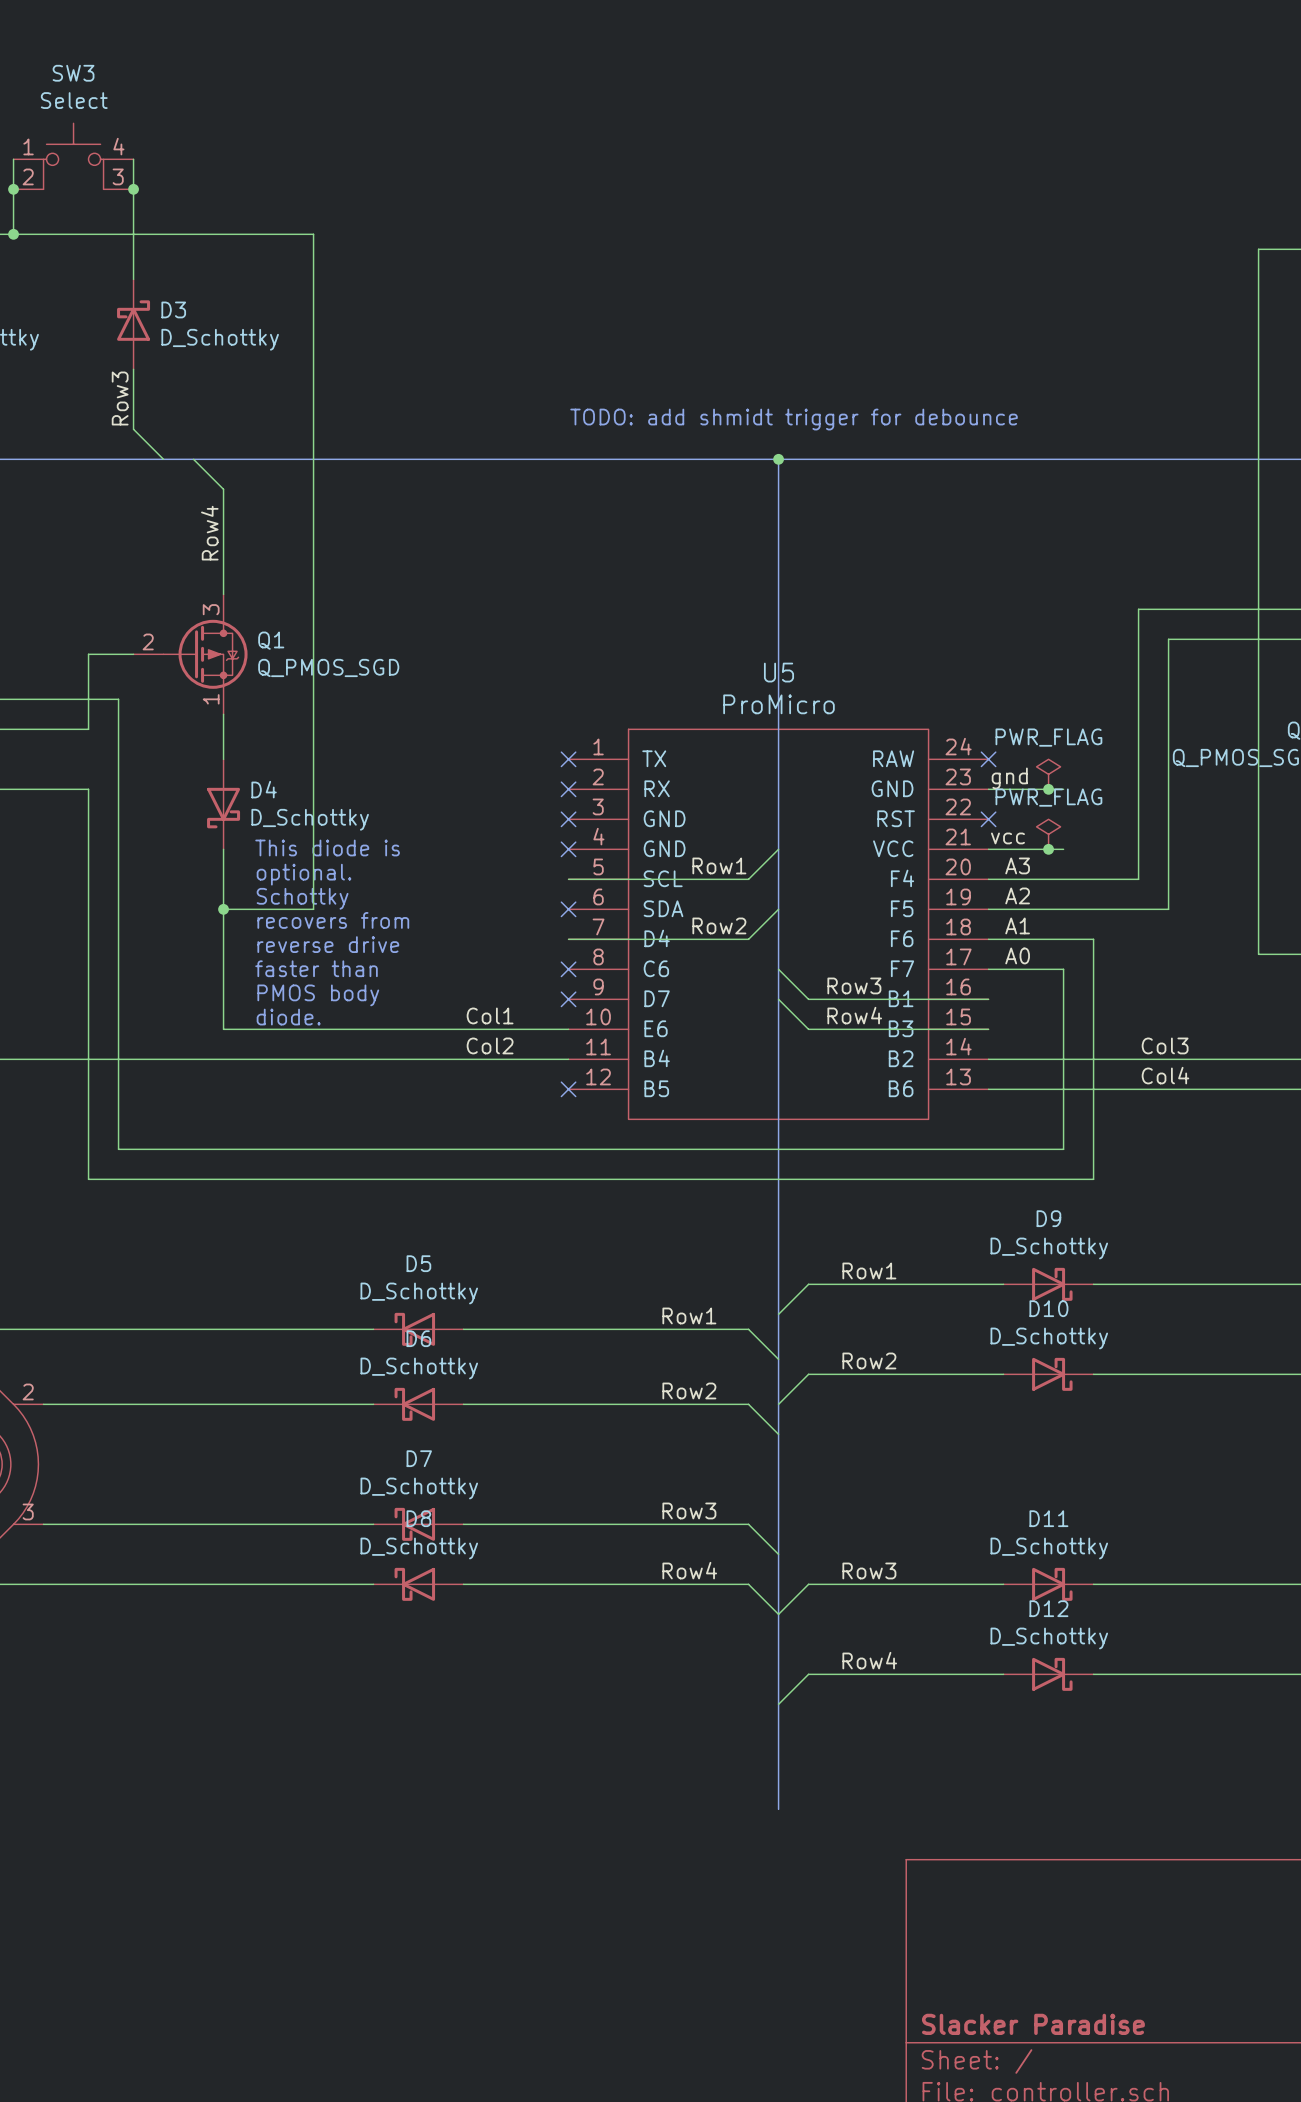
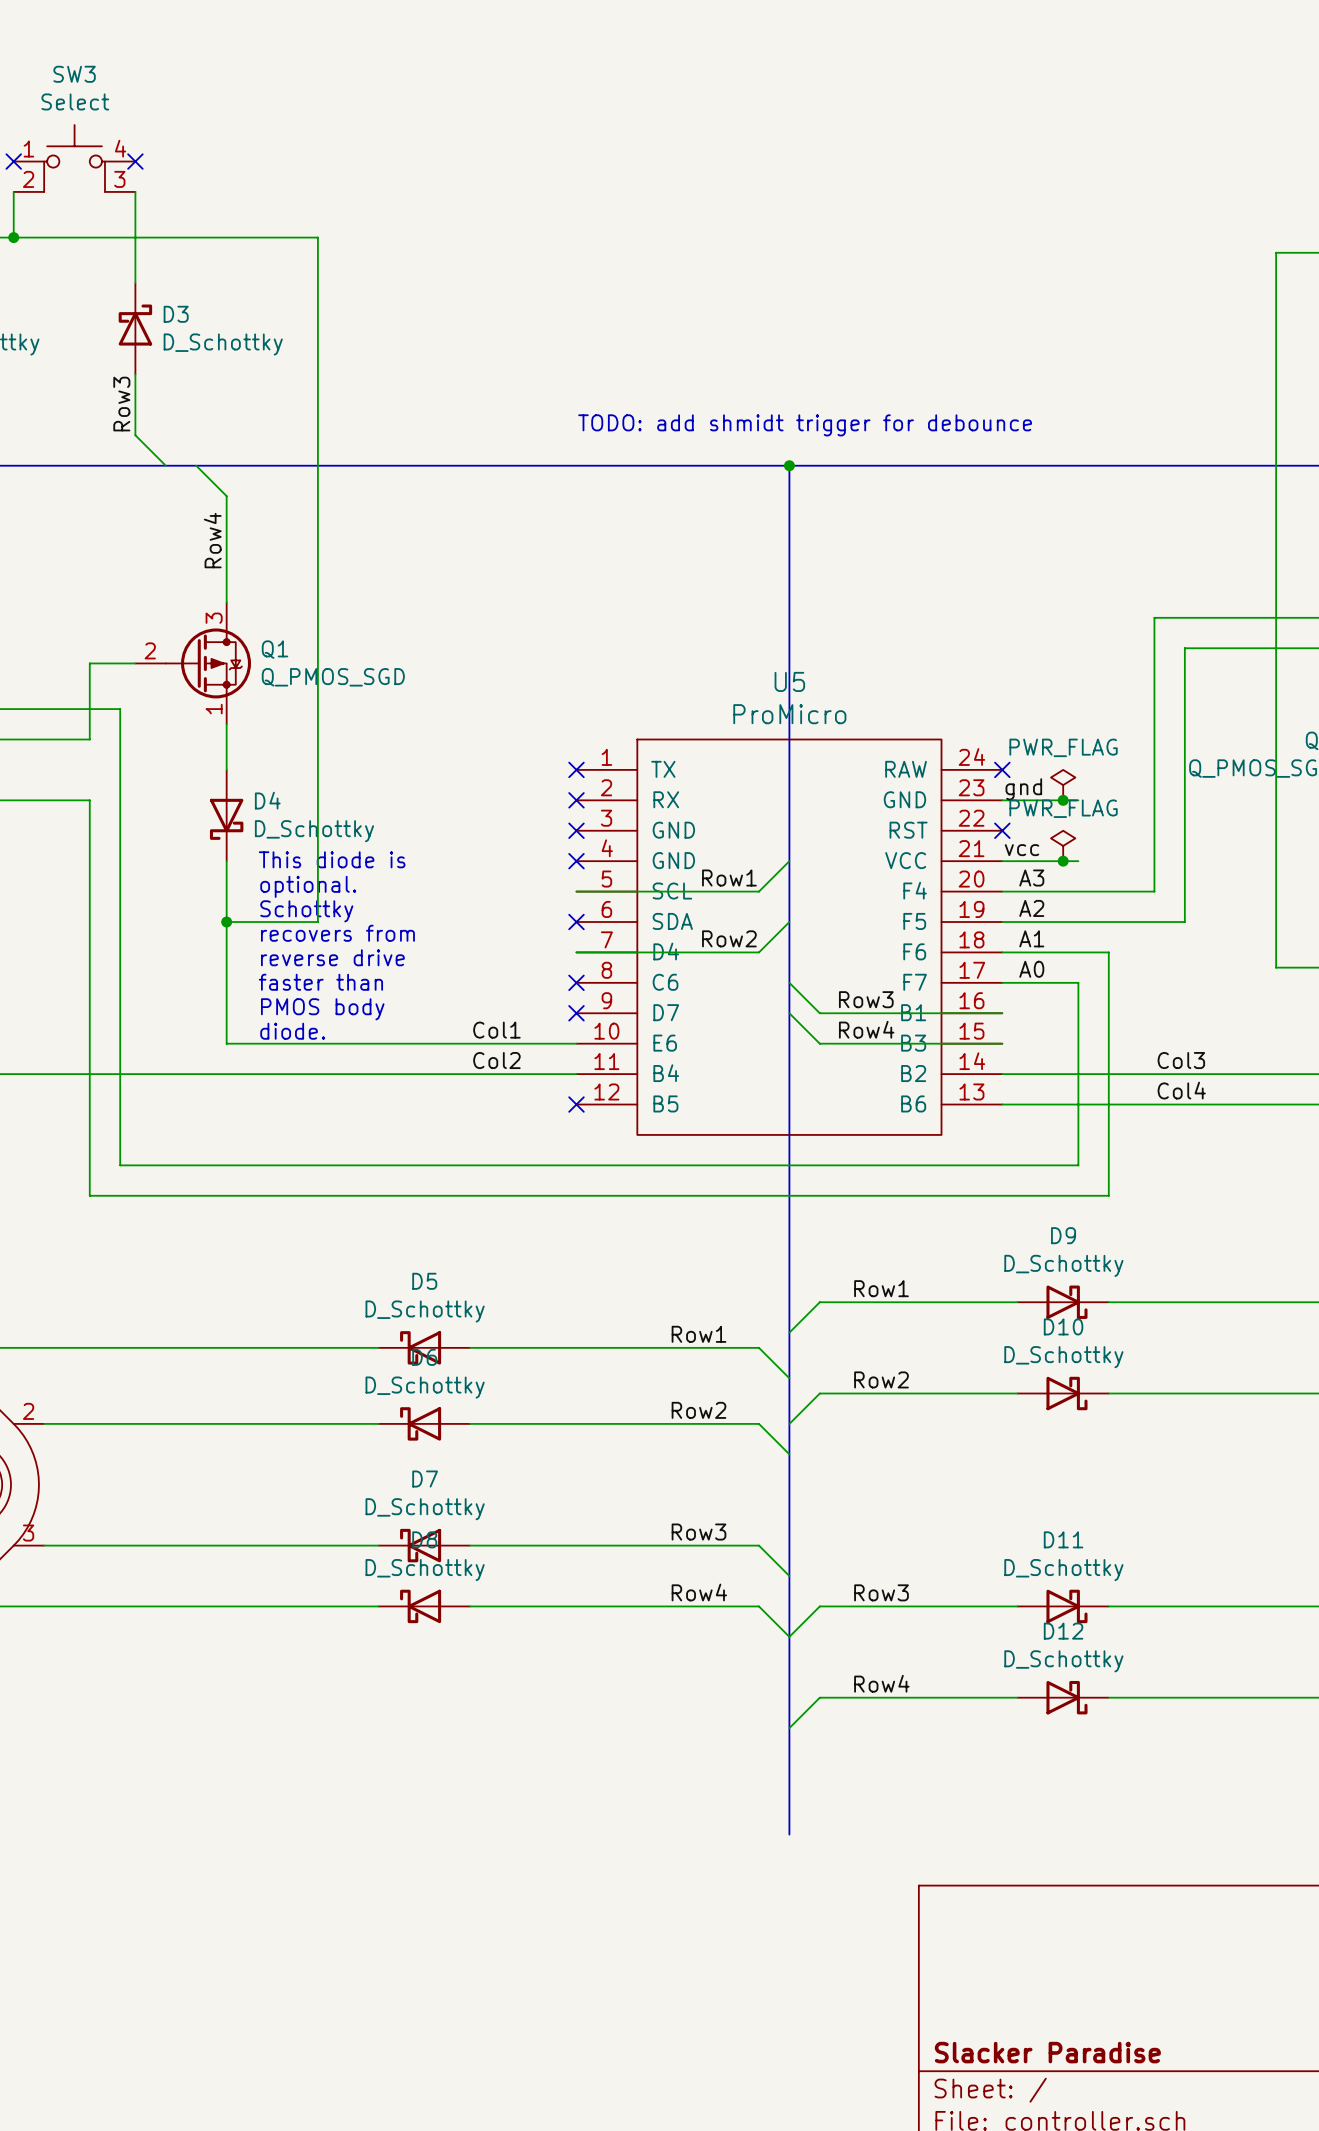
wire: (13, 159) (13, 189) -> none
no-connect mark: none -> (13, 161)
wire: (133, 159) (133, 189) -> none
no-connect mark: none -> (135, 161)
junction: (13, 189) -> none
junction: (133, 189) -> none

